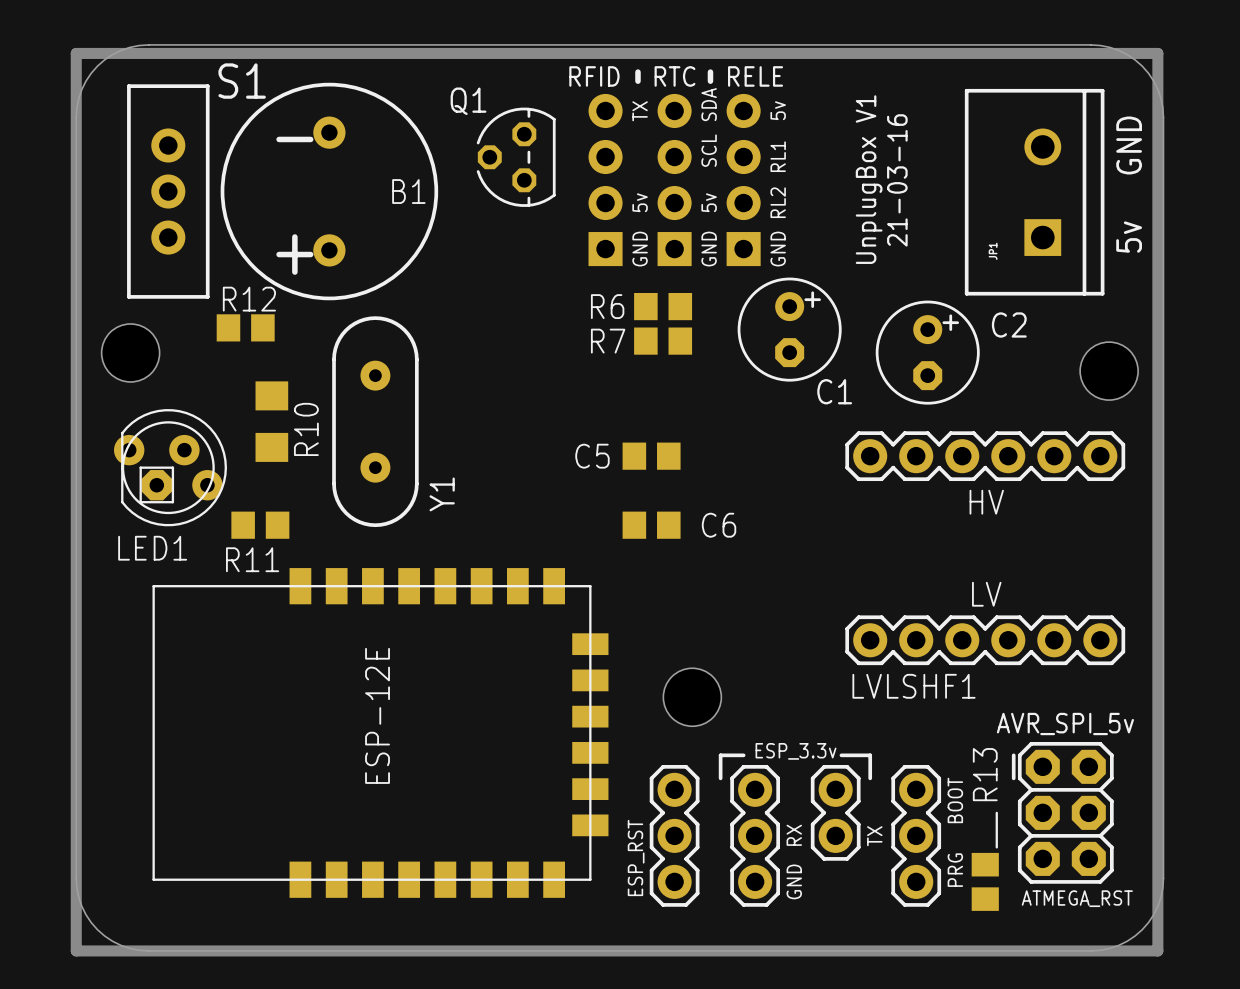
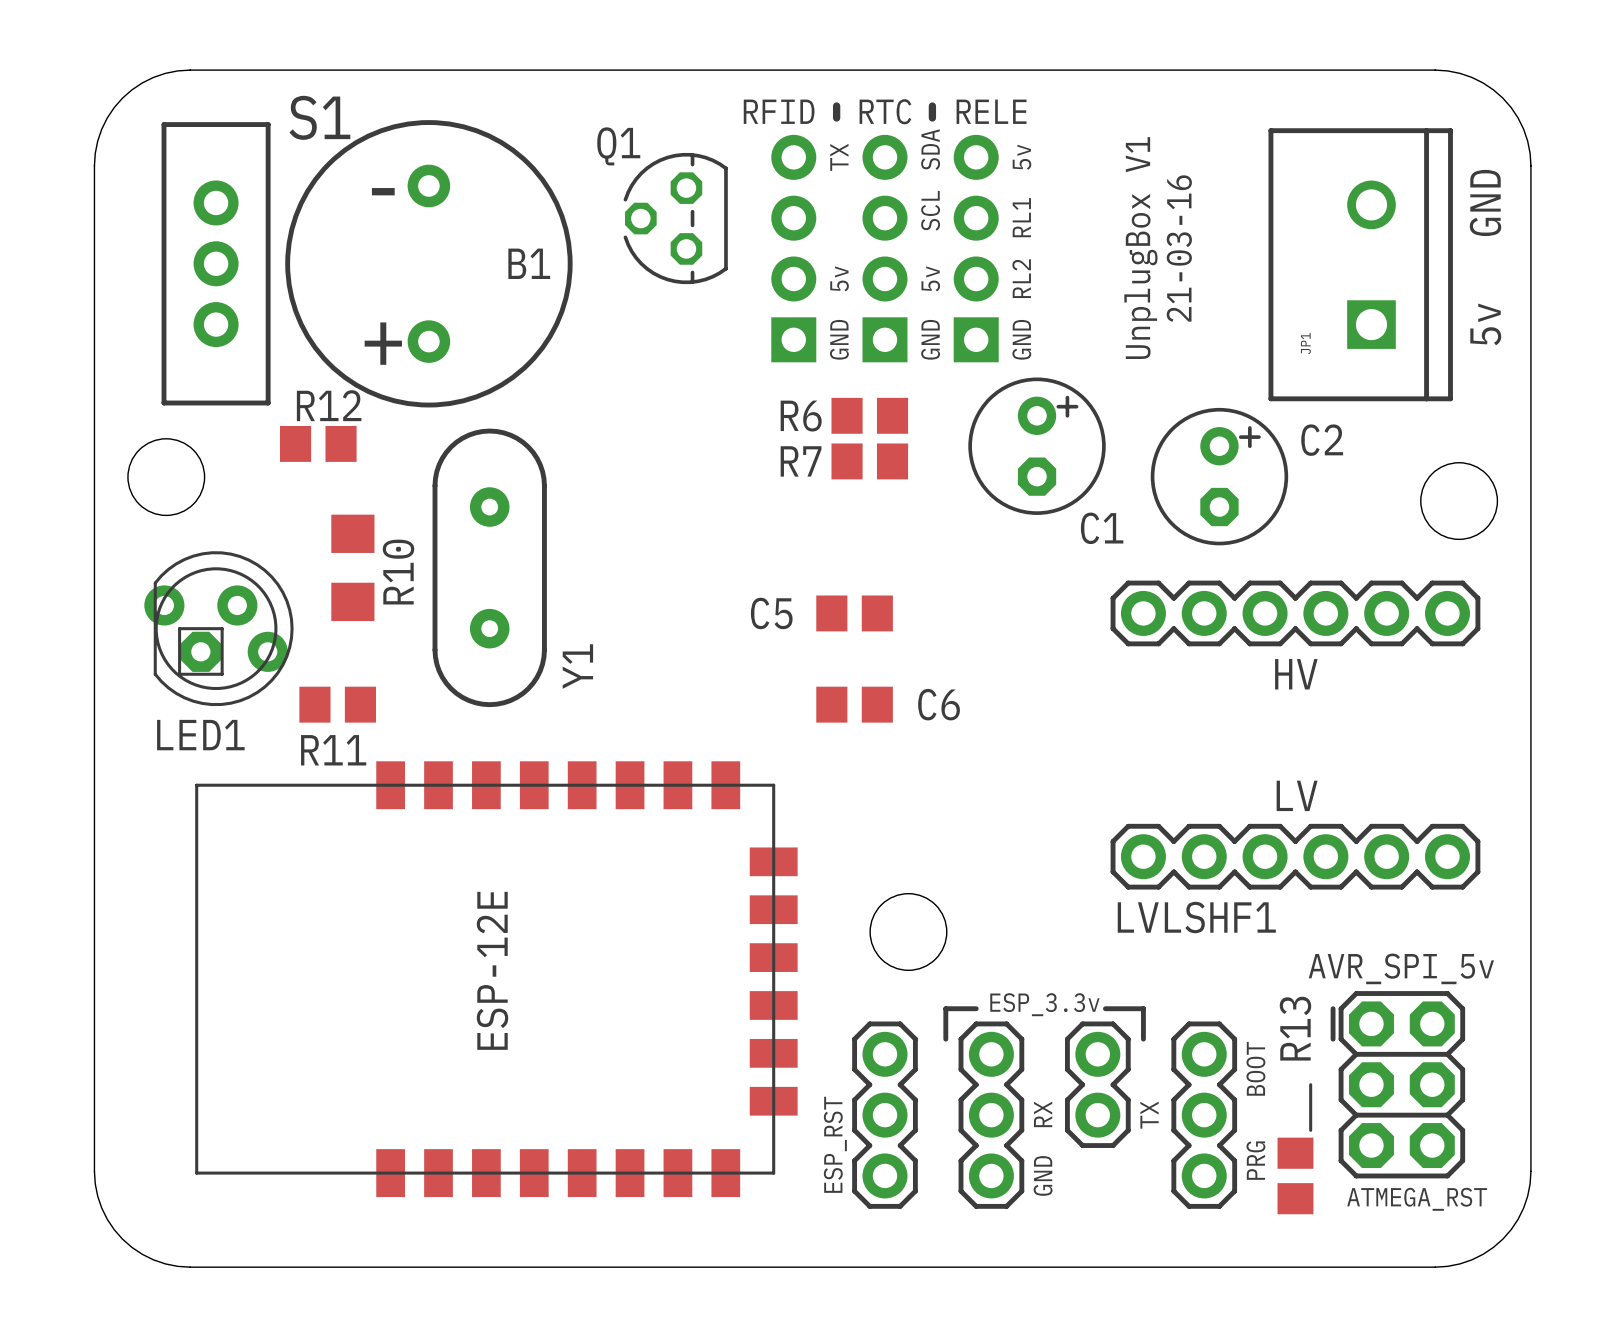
line: (76, 53) (1157, 53) (1157, 950) (76, 950) (76, 53) -> none

